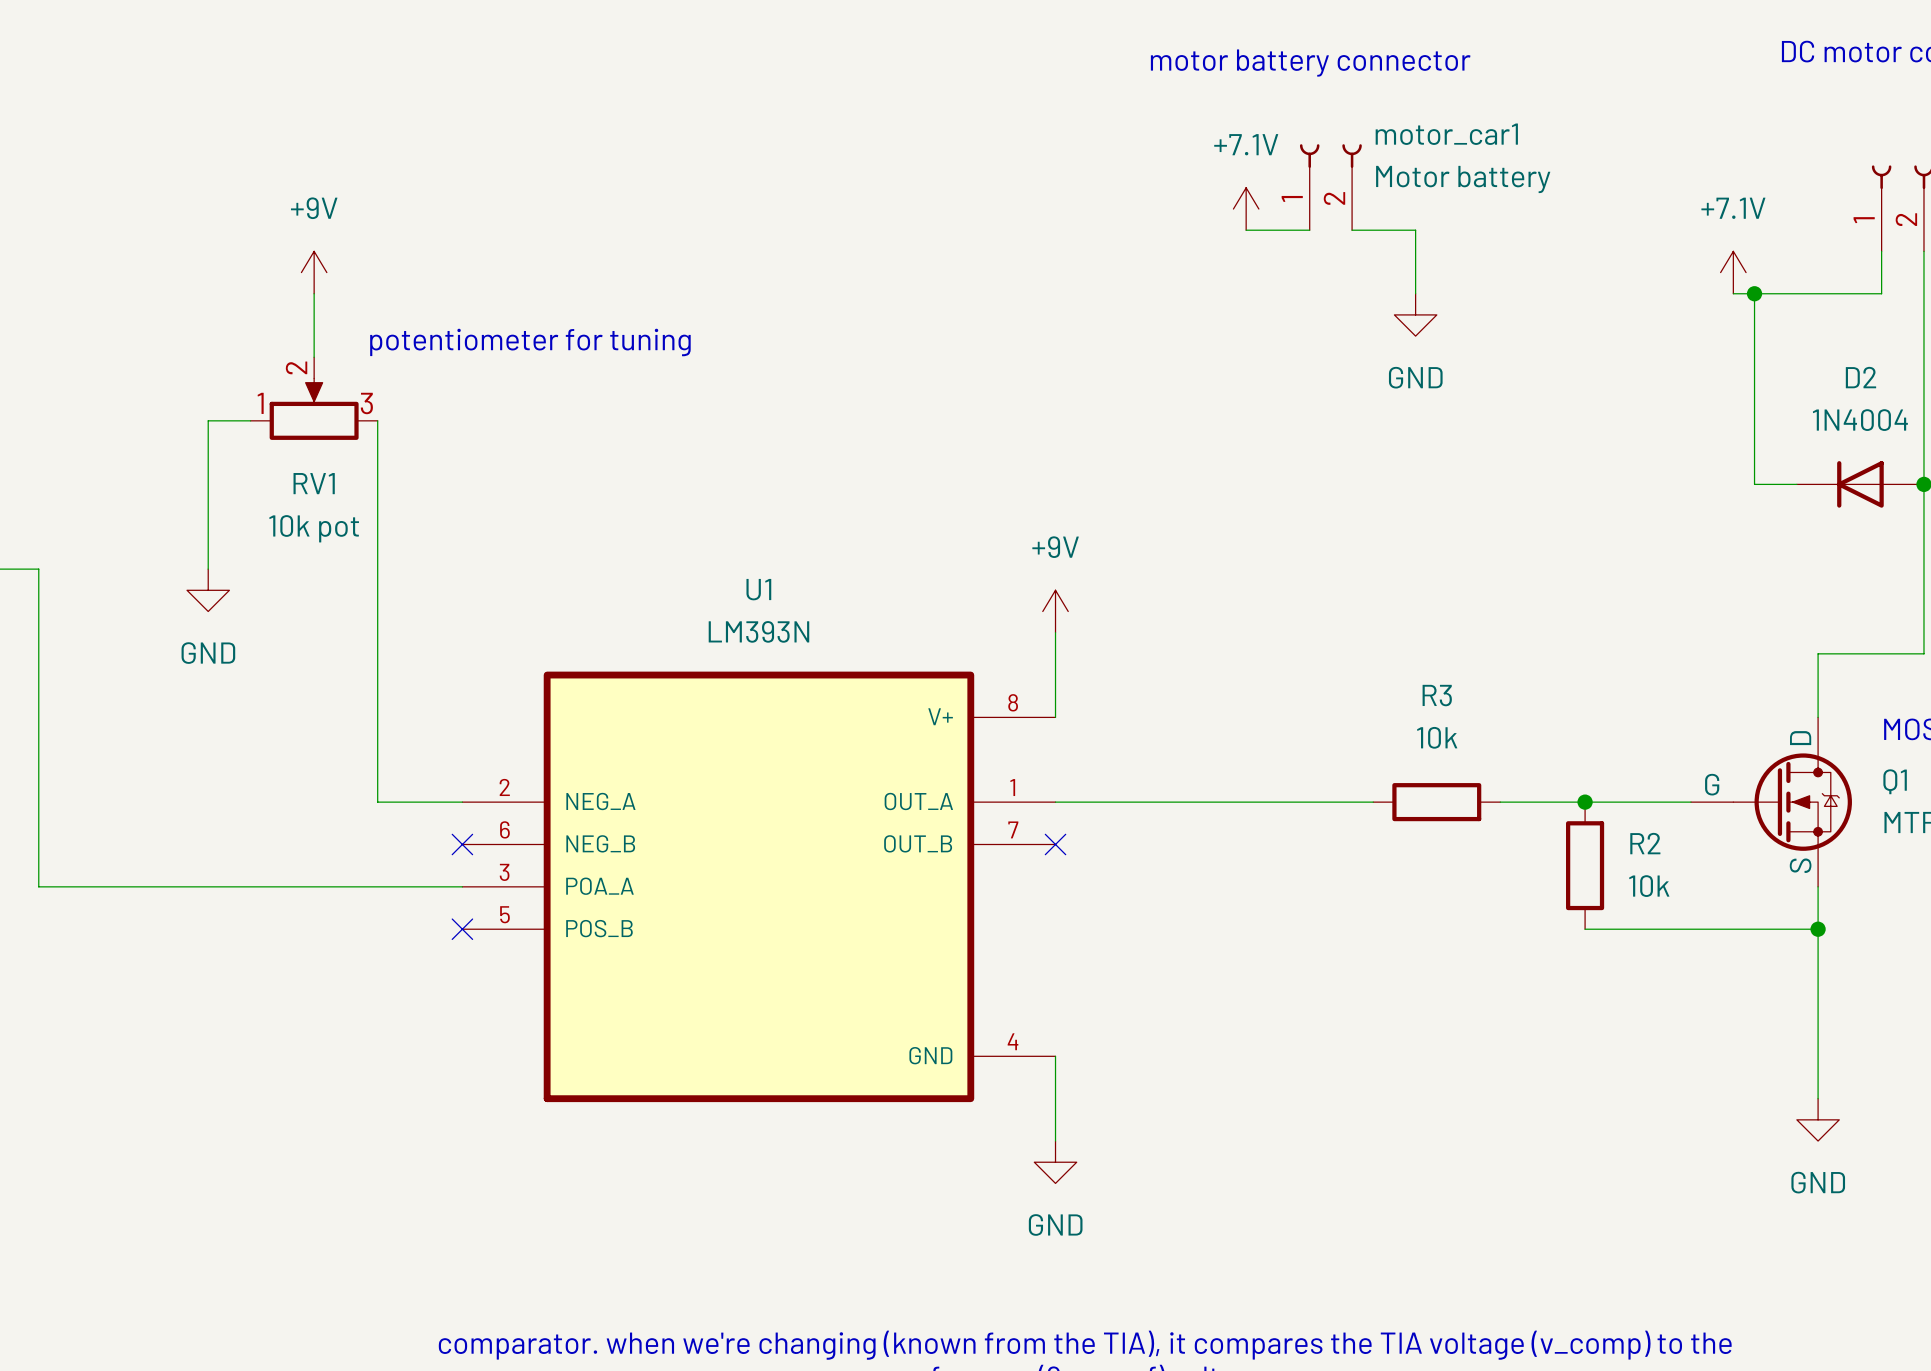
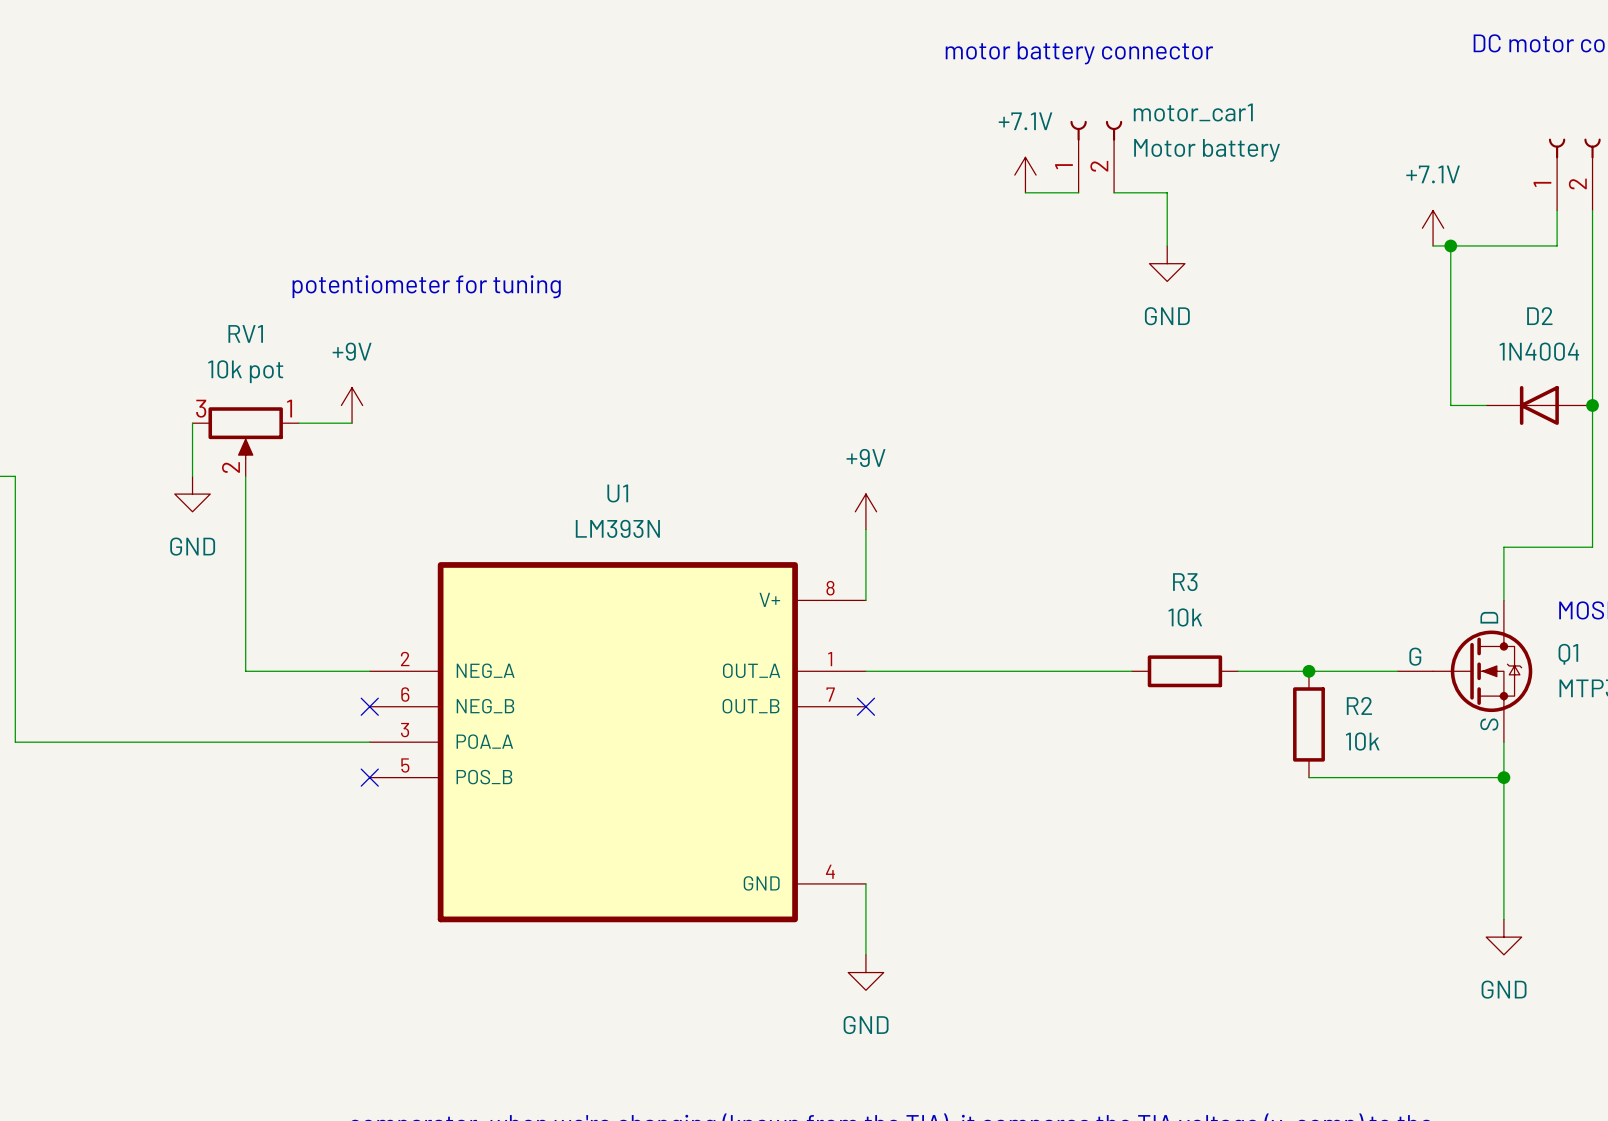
power symbol position: +9V (314, 272) -> +9V (352, 405)
wire: (314, 293) (314, 357) -> (192, 423) (192, 476)
RV1 position: (314, 398) -> (245, 441)
RV1 rotation: 0° (314, 409) -> 180° (245, 432)
wire: (250, 420) (208, 420) (208, 569) -> none
wire: (377, 420) (377, 802) -> (245, 476) (245, 671) (298, 671)
RV1 name position: RV1 (314, 483) -> RV1 (245, 333)
wire: none -> (298, 423) (352, 423)
RV1 value position: 10k pot (314, 528) -> 10k pot (245, 371)
power symbol position: GND (208, 590) -> GND (192, 494)

